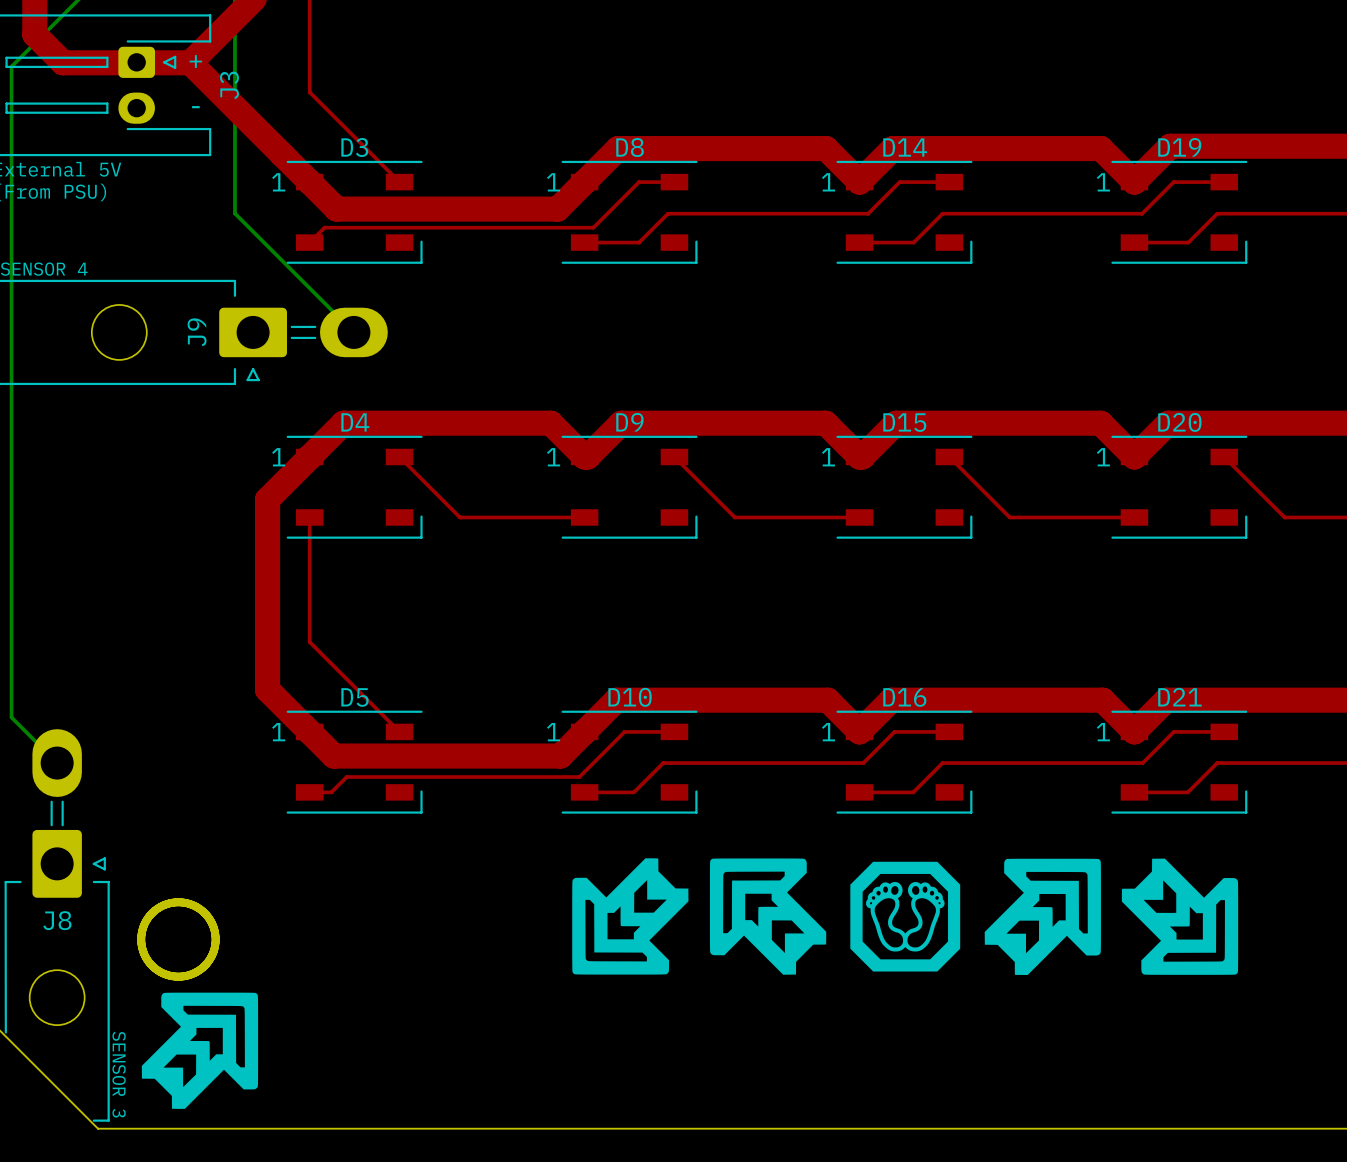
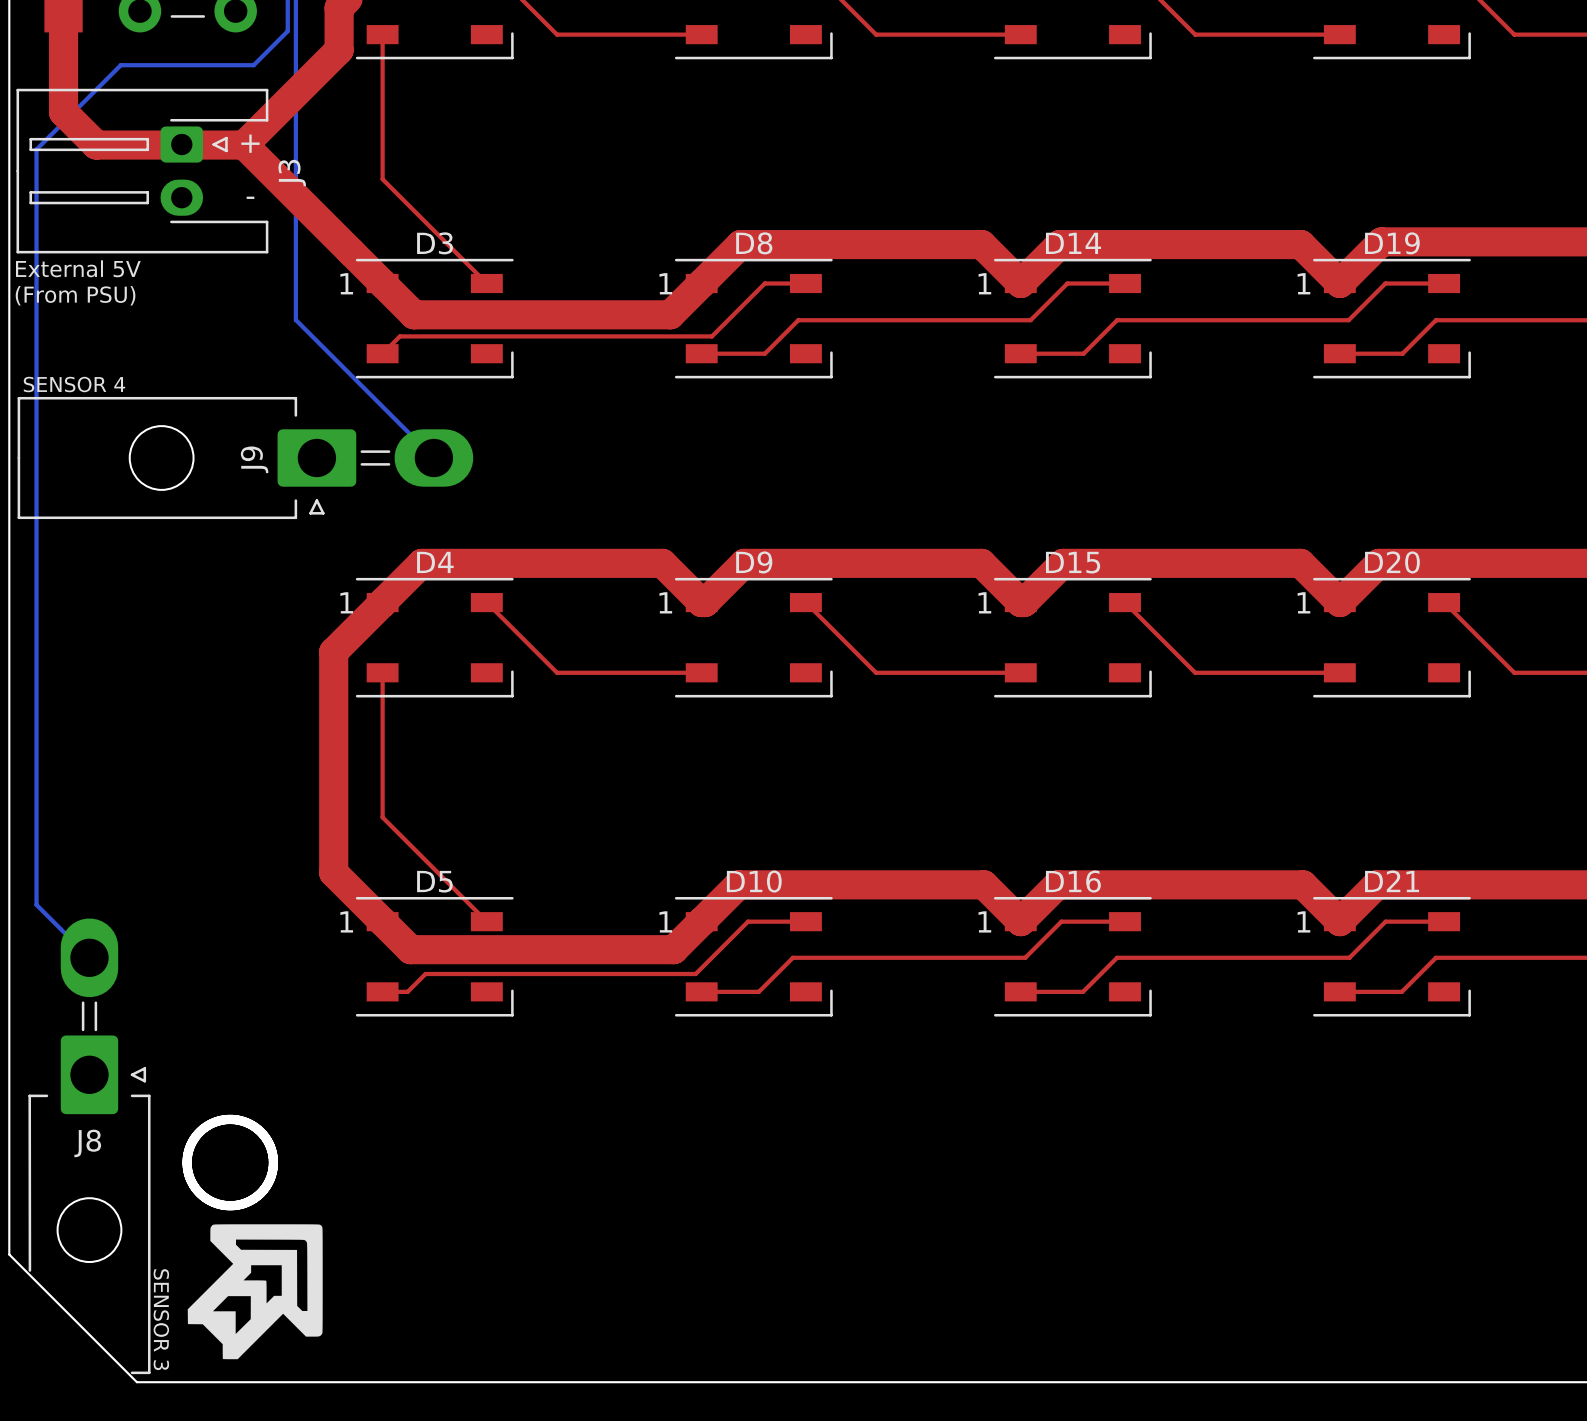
drawing: [572, 858, 827, 975] -> none
drawing: [984, 858, 1239, 975] -> none
drawing: [850, 861, 961, 972] -> none

